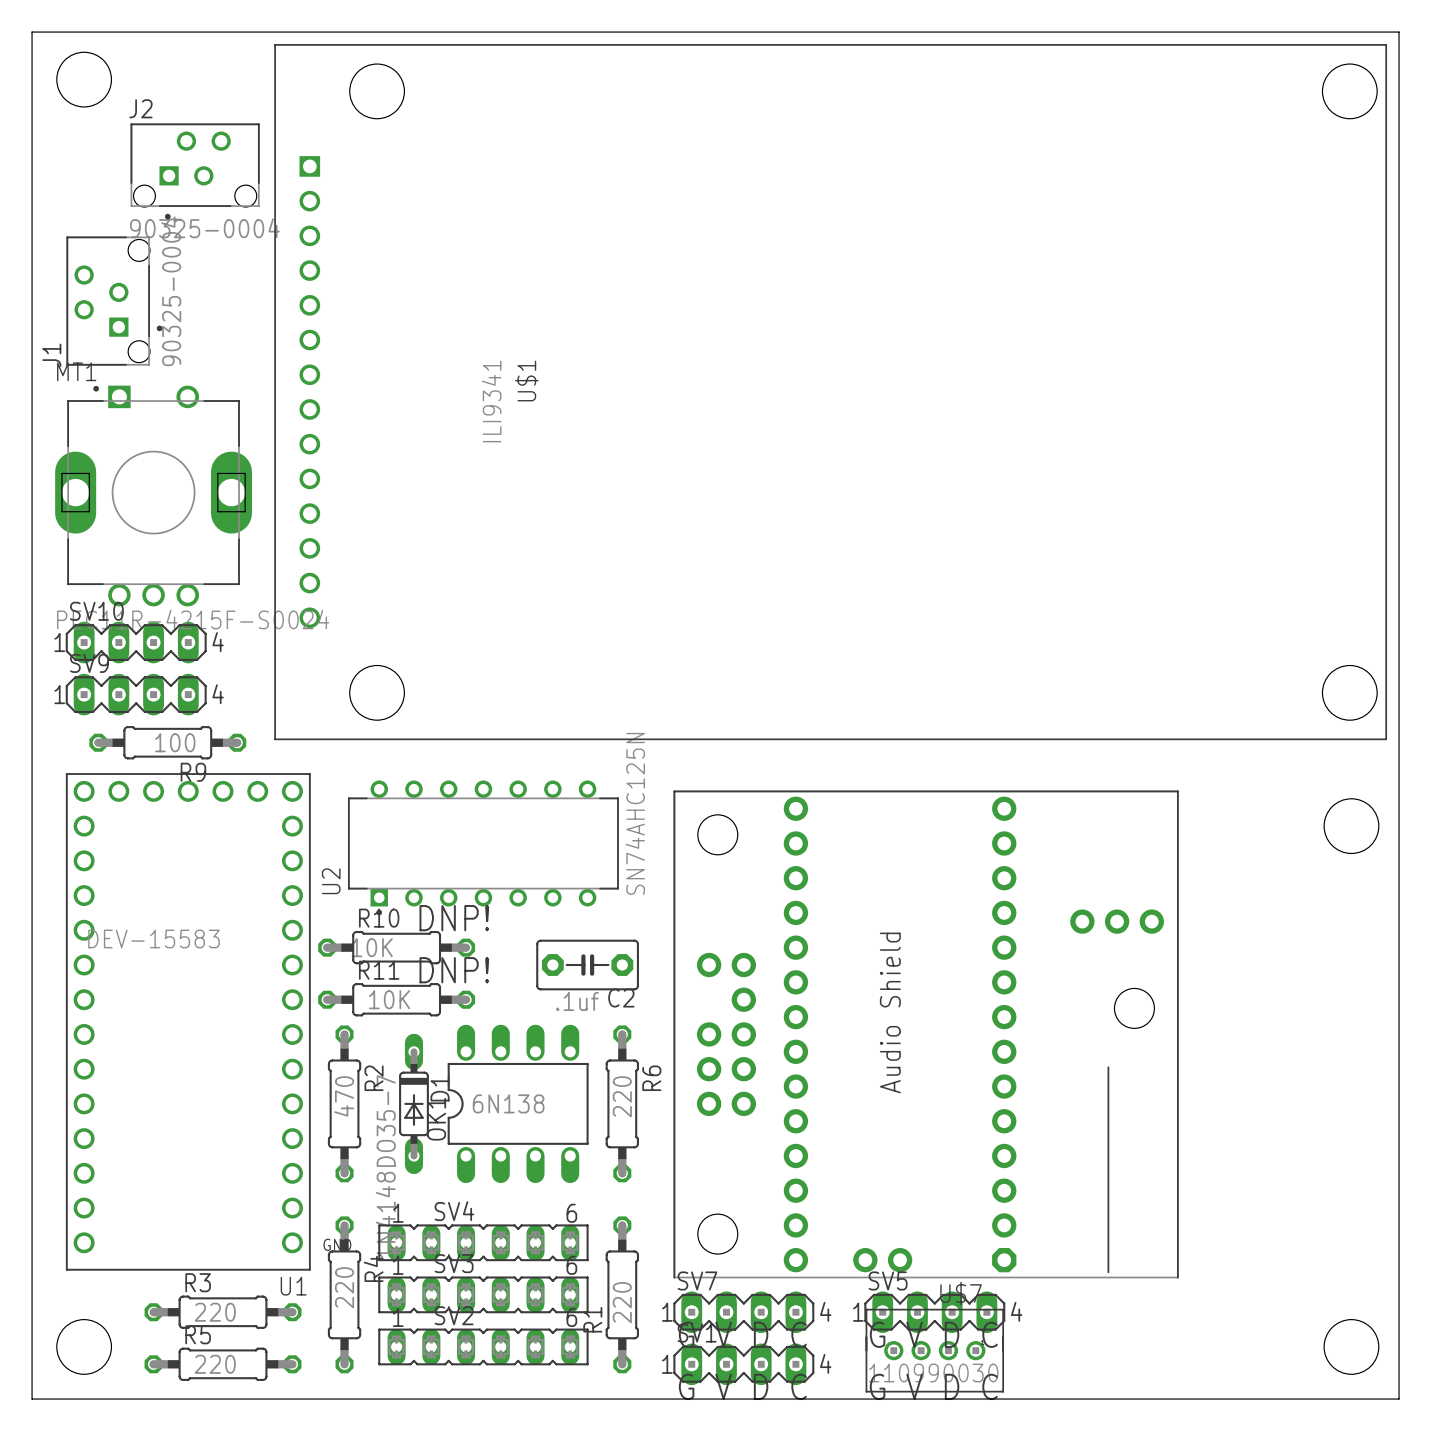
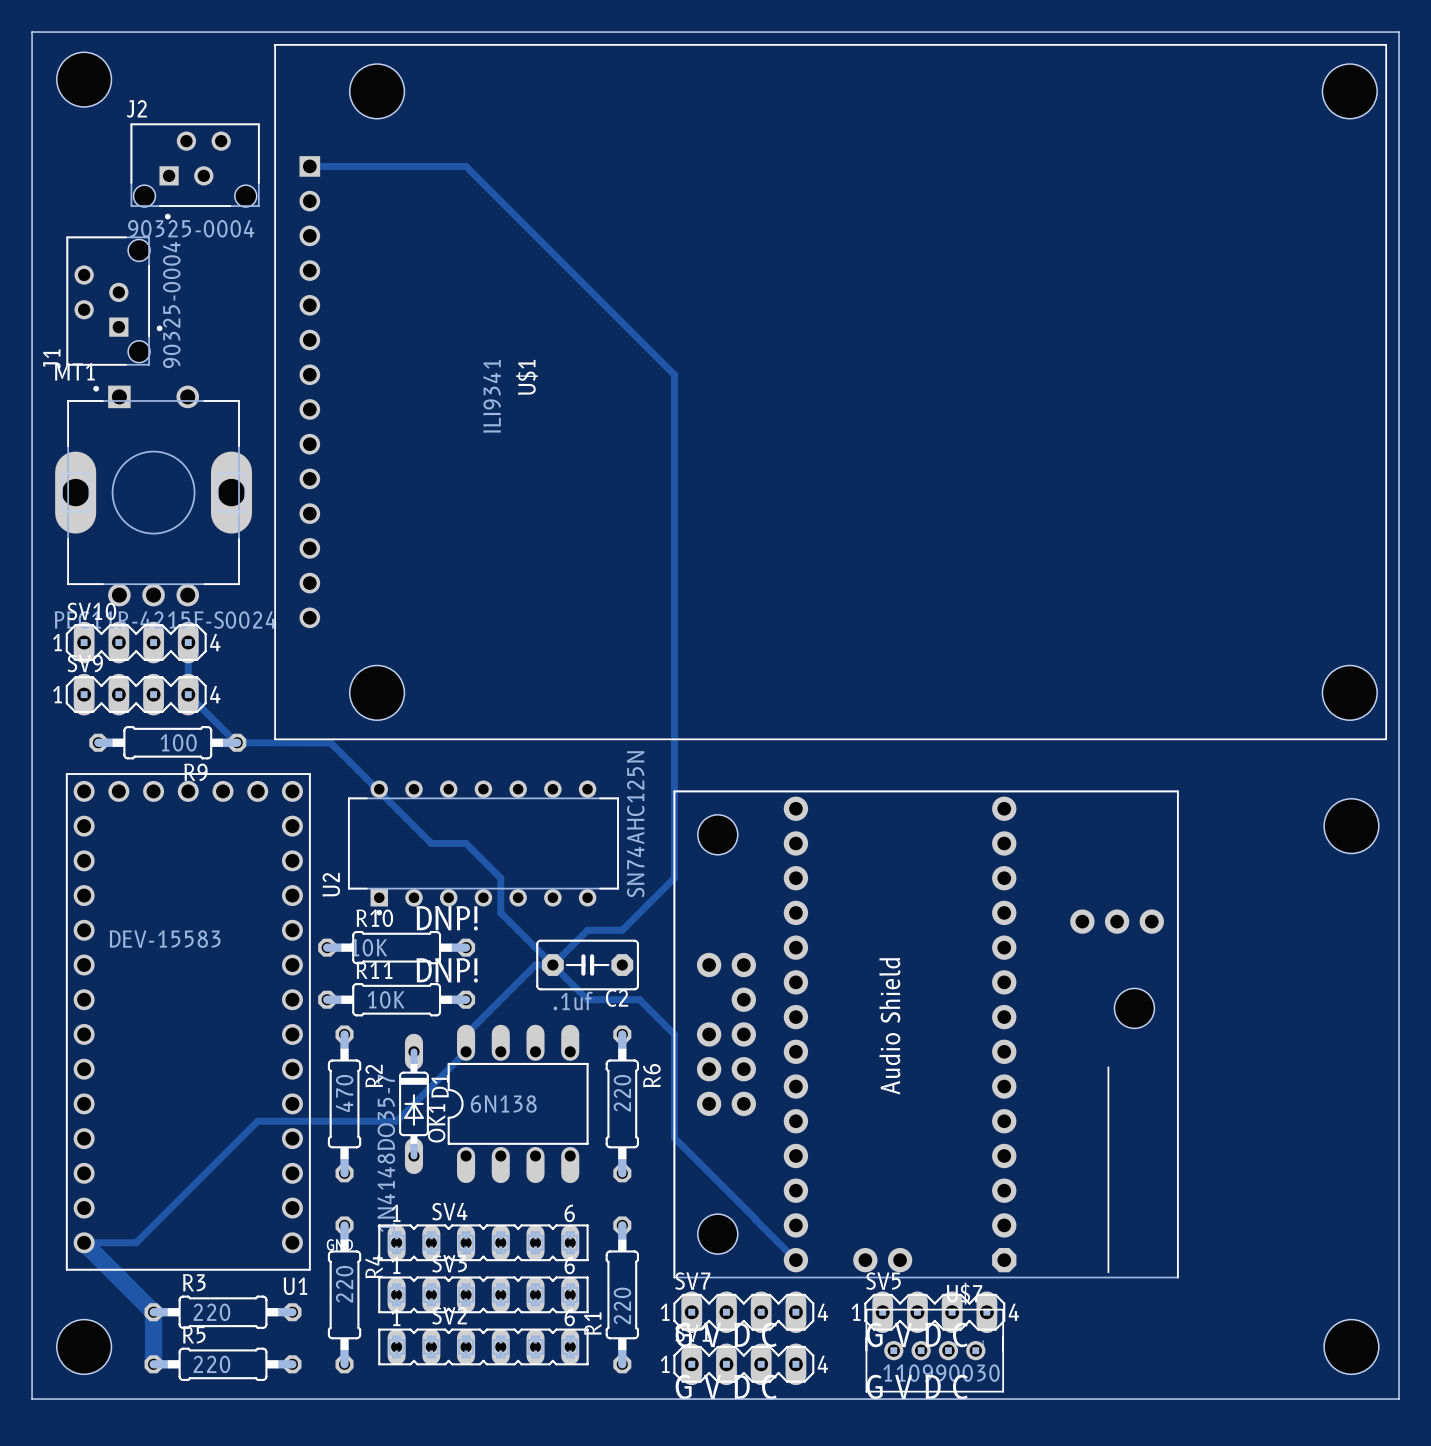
track: none -> (309, 166) (466, 166) (674, 374) (674, 878) (622, 930) (587, 930) (552, 965) (535, 965) (466, 1034) (466, 1051) (396, 1121) (257, 1121) (136, 1242) (84, 1242) (153, 1312) (153, 1364)
track: none -> (188, 642) (188, 694) (236, 742) (330, 743) (377, 789) (379, 789) (379, 791) (431, 843) (466, 843) (500, 878) (500, 912) (587, 999) (639, 999) (674, 1034) (674, 1137) (795, 1260)

